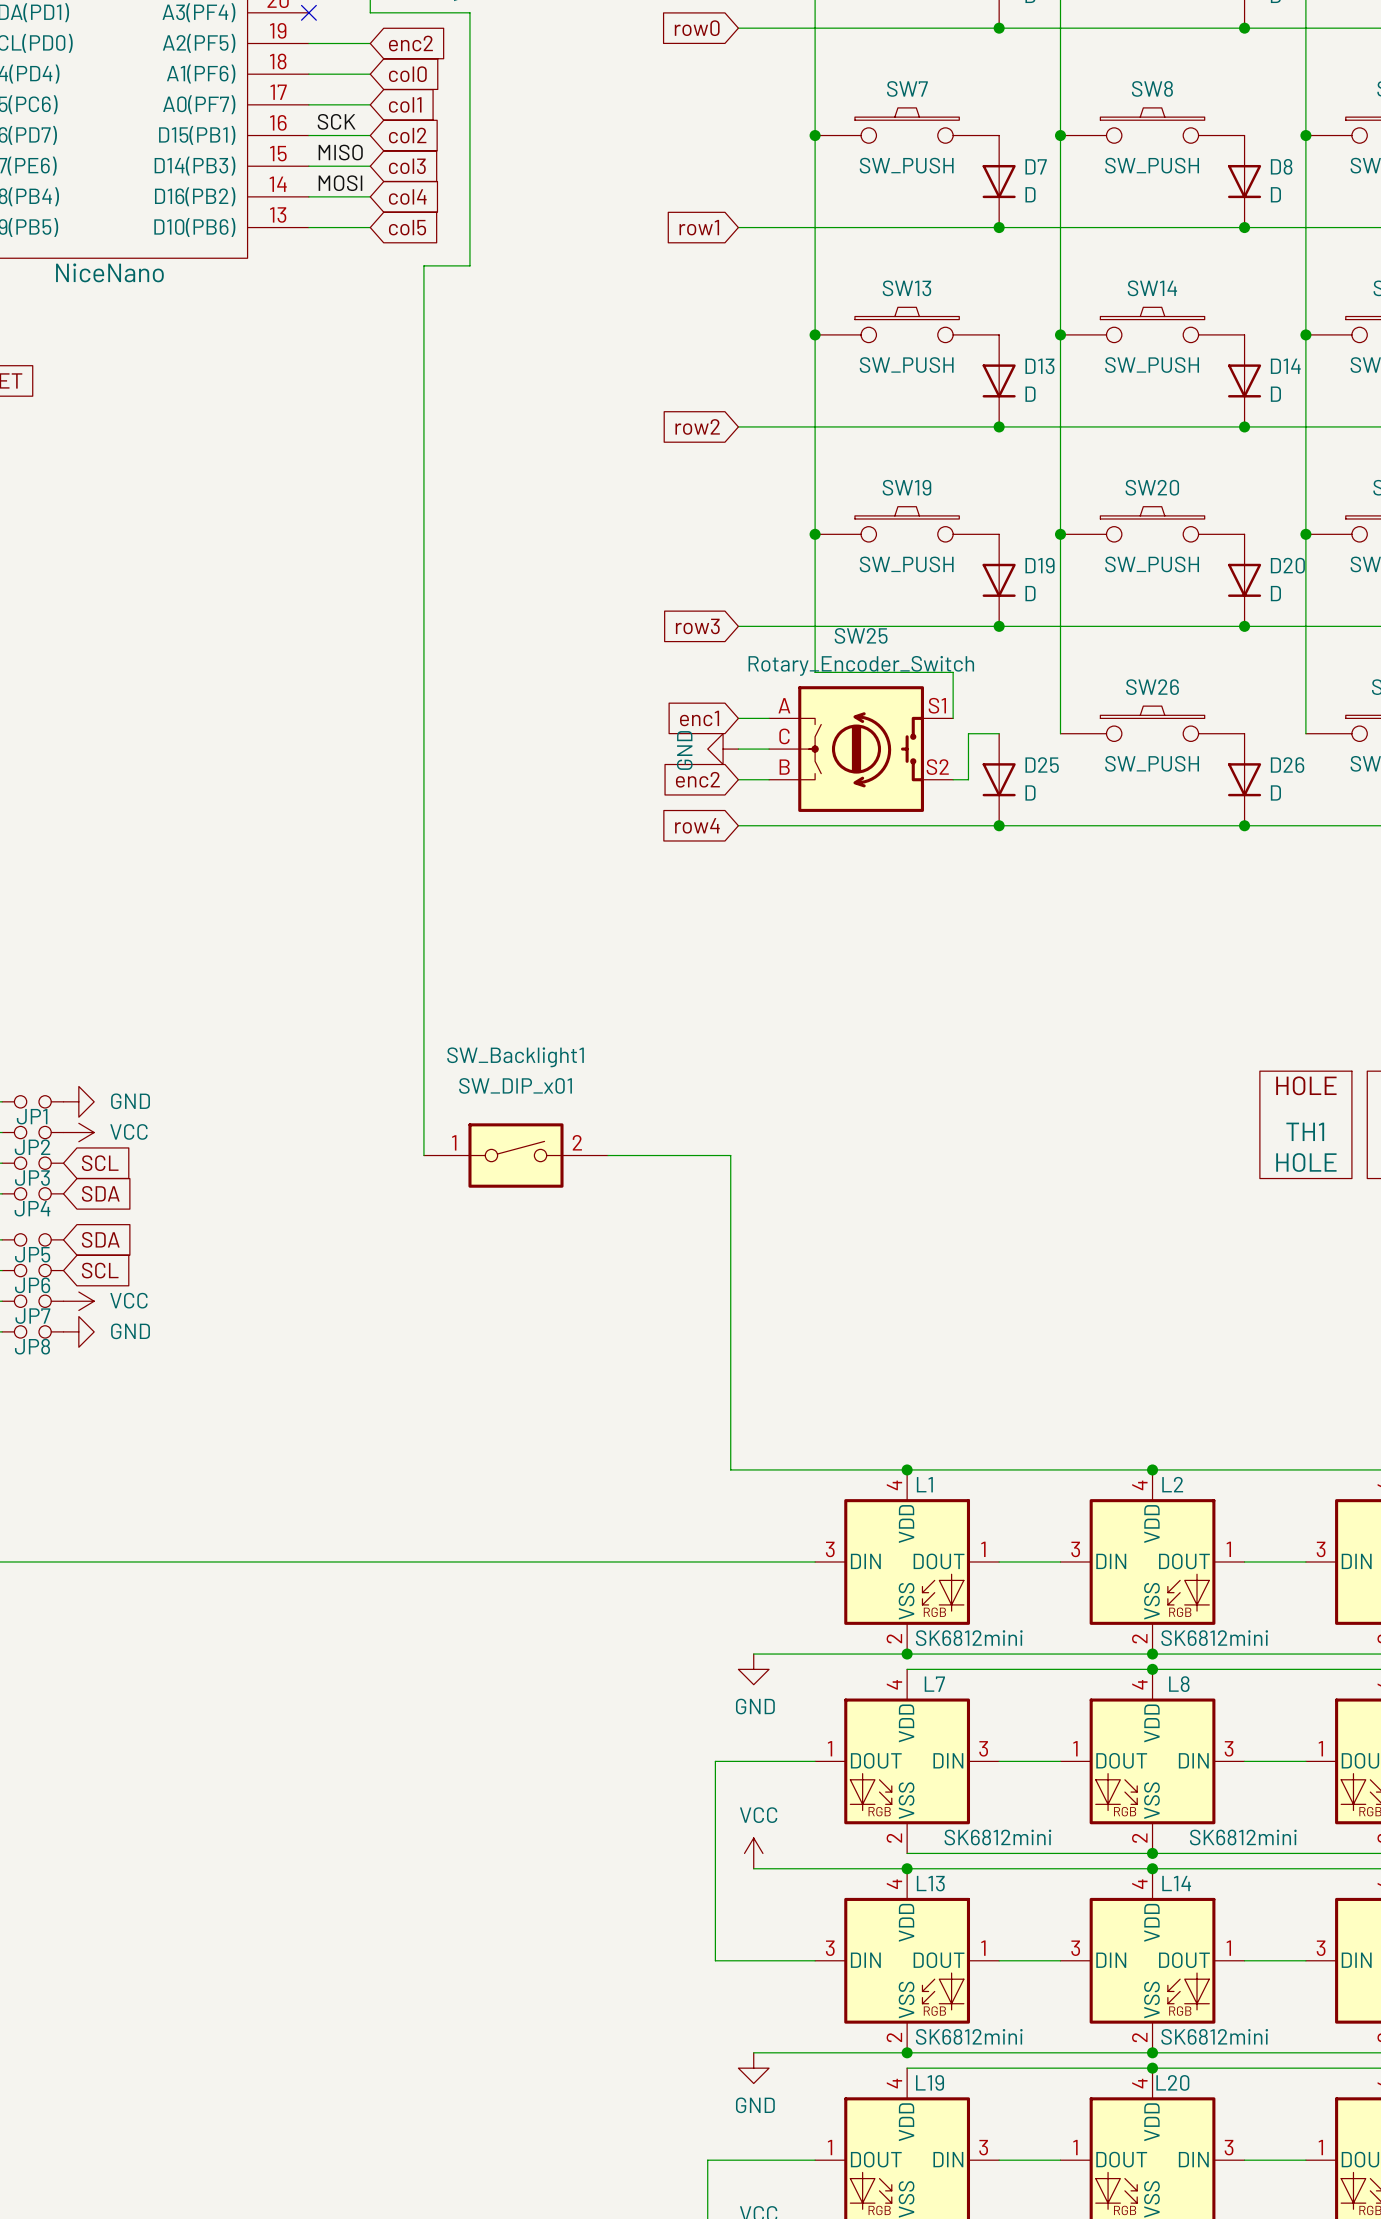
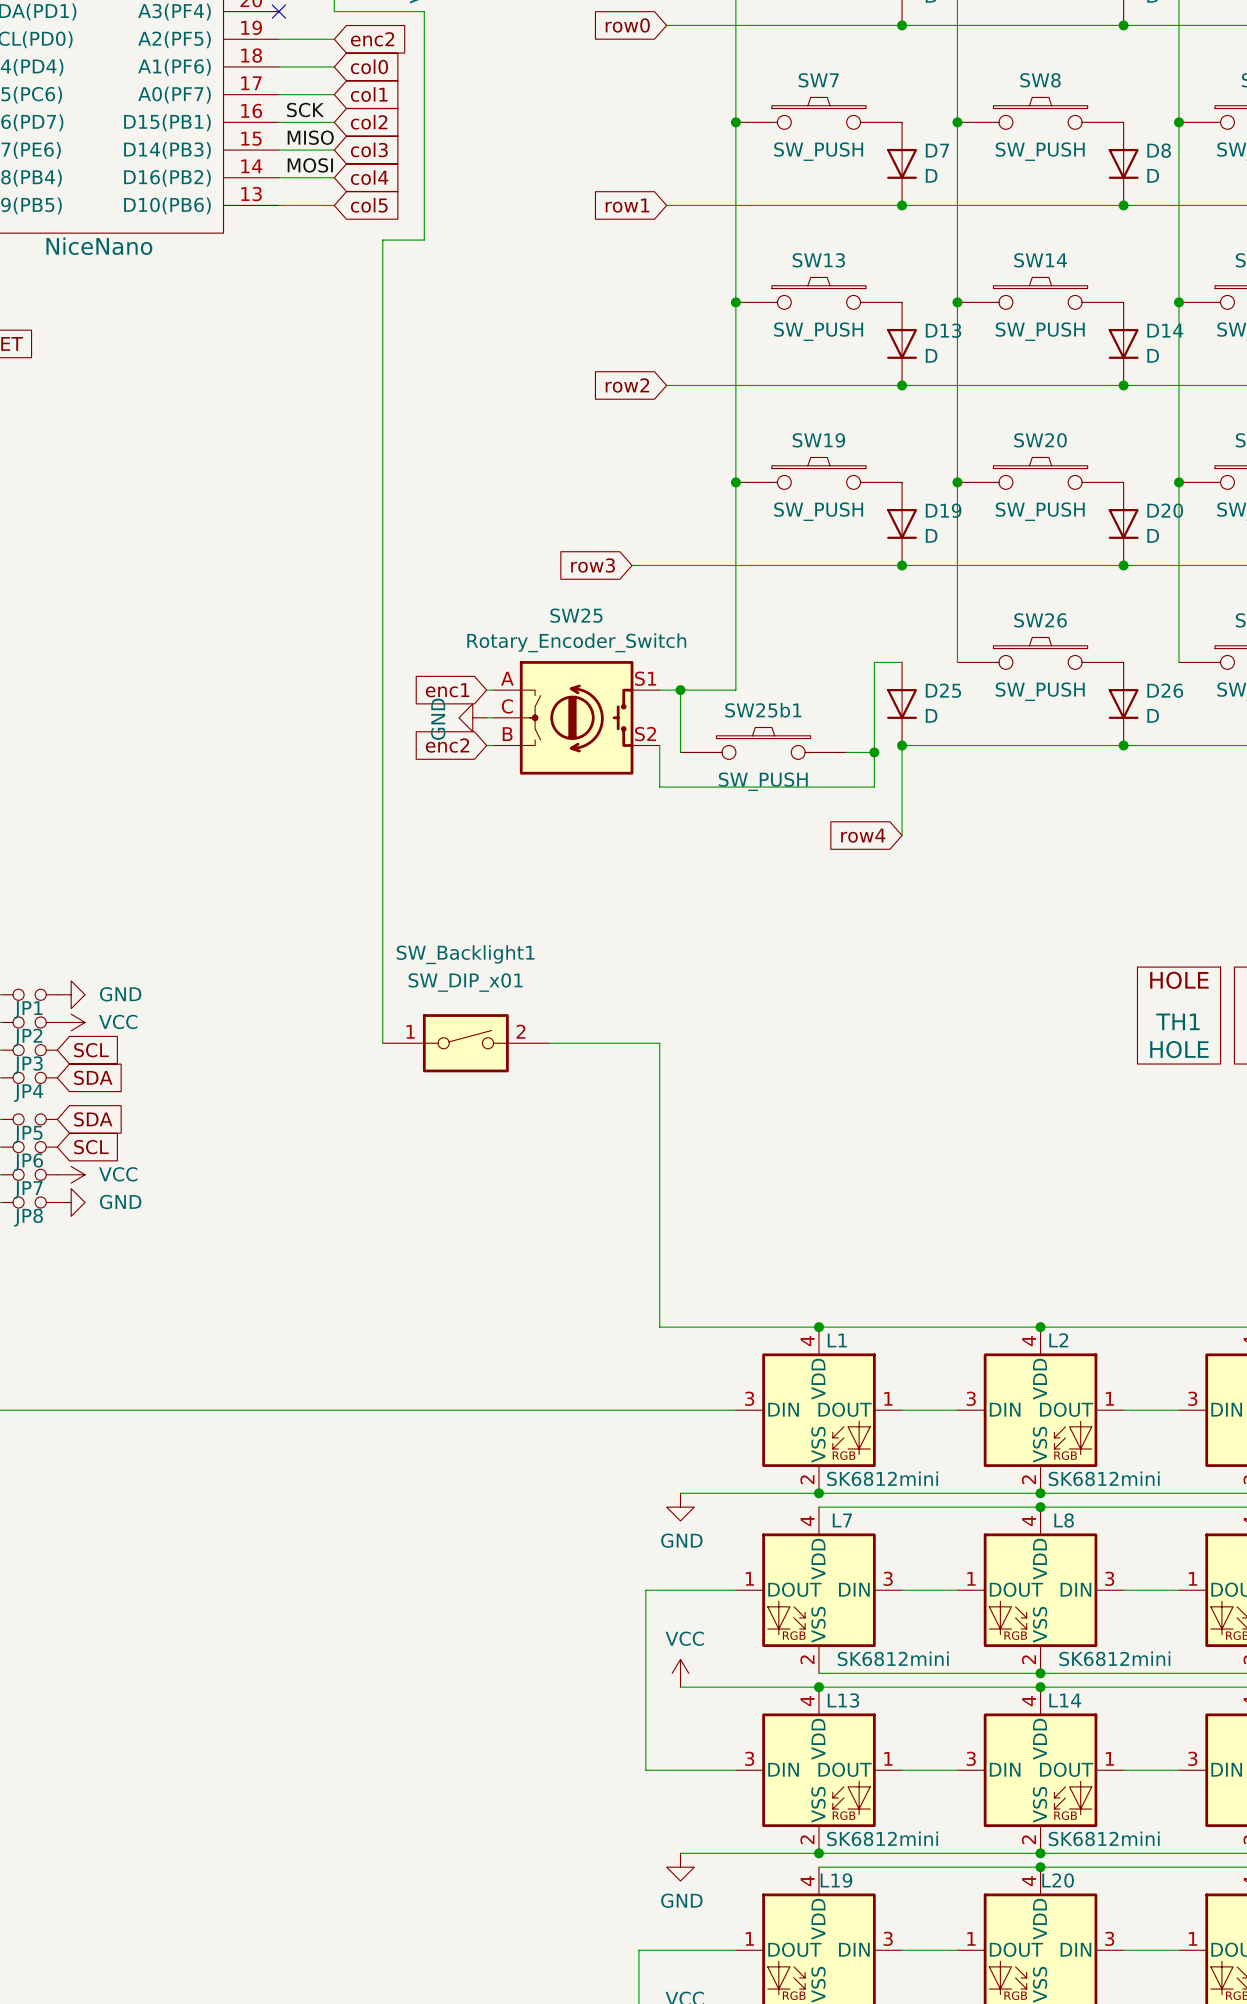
global label position: row3 (697, 626) -> row3 (593, 565)
wire: none -> (632, 565) (666, 565)
wire: (815, 672) (953, 672) (953, 718) -> (735, 607) (735, 690) (659, 690)
global label position: enc1 (699, 718) -> enc1 (447, 690)
wire: (738, 718) (769, 718) -> none
power symbol position: GND (723, 749) -> GND (472, 717)
wire: (738, 749) (769, 749) -> none
SW25 position: (861, 749) -> (576, 717)
wire: none -> (486, 690) (493, 690)
wire: none -> (680, 690) (680, 752)
junction: none -> (680, 690)
global label position: enc2 (697, 779) -> enc2 (447, 745)
wire: (738, 779) (769, 779) -> (846, 752) (874, 752)
wire: (953, 779) (968, 779) -> (659, 745) (659, 787) (874, 787) (874, 703)
wire: none -> (486, 717) (493, 717)
SW25b1: none -> SW_PUSH (763, 743)
wire: none -> (486, 745) (493, 745)
global label position: row4 (697, 825) -> row4 (863, 835)
wire: (738, 825) (999, 825) -> (902, 835) (902, 745)
junction: none -> (874, 752)

